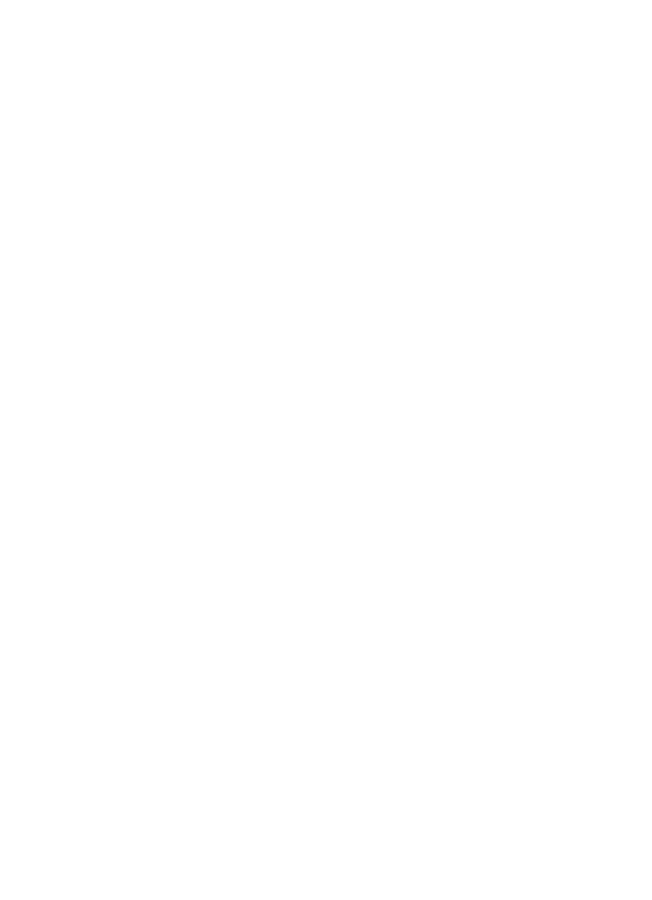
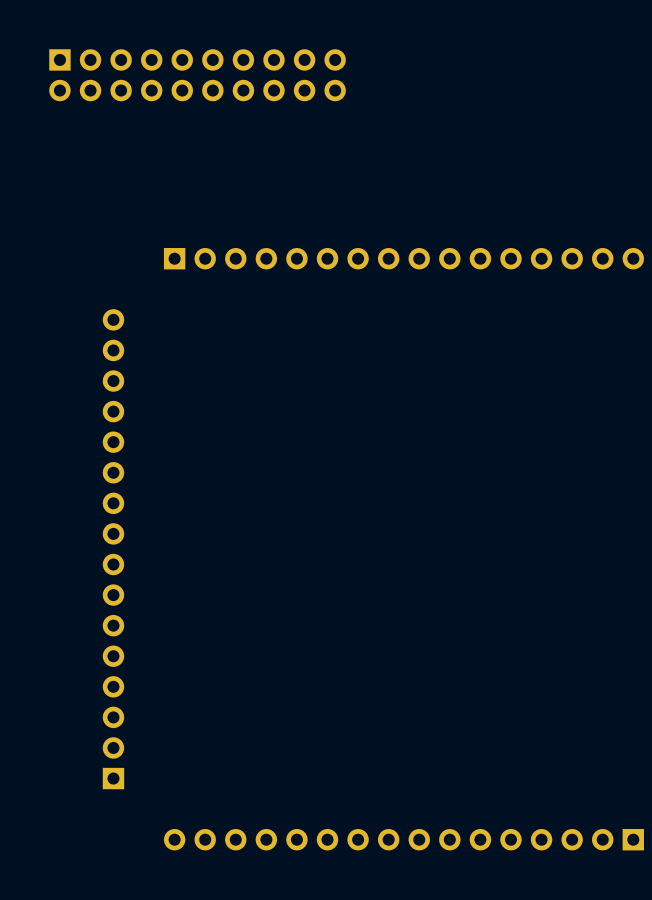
part: none -> (197, 75)
part: none -> (403, 258)
part: none -> (113, 549)
part: none -> (403, 839)

